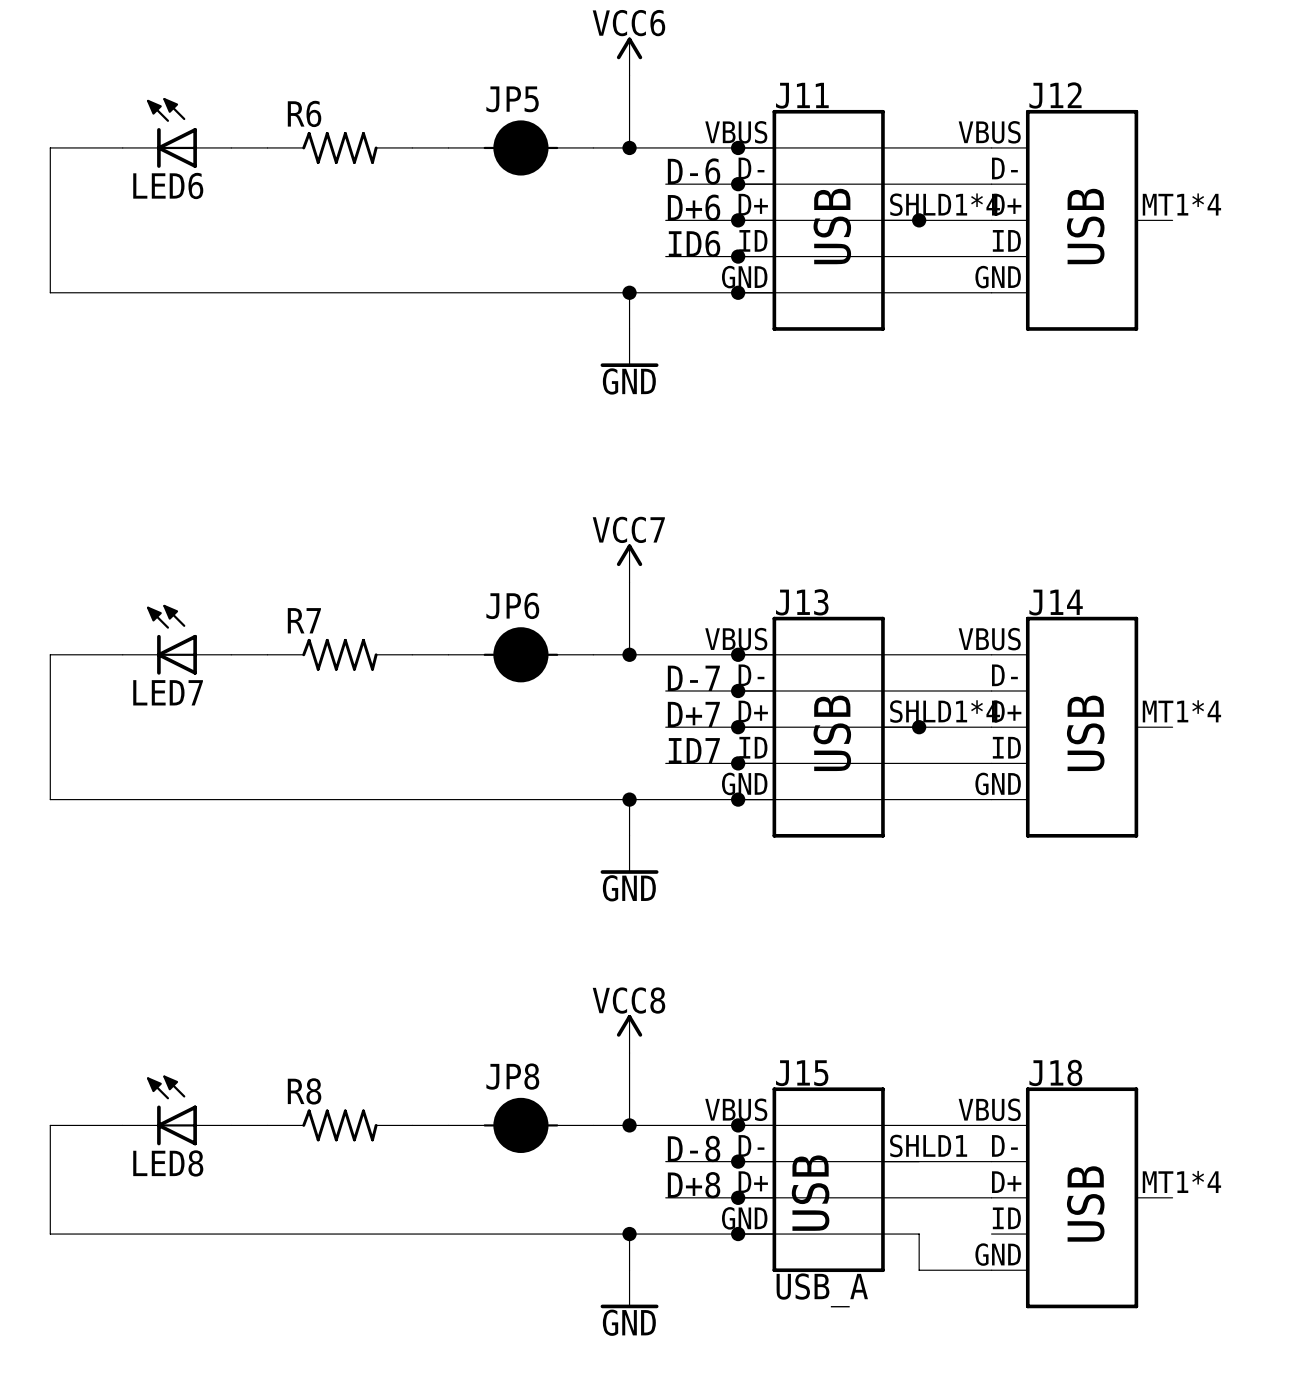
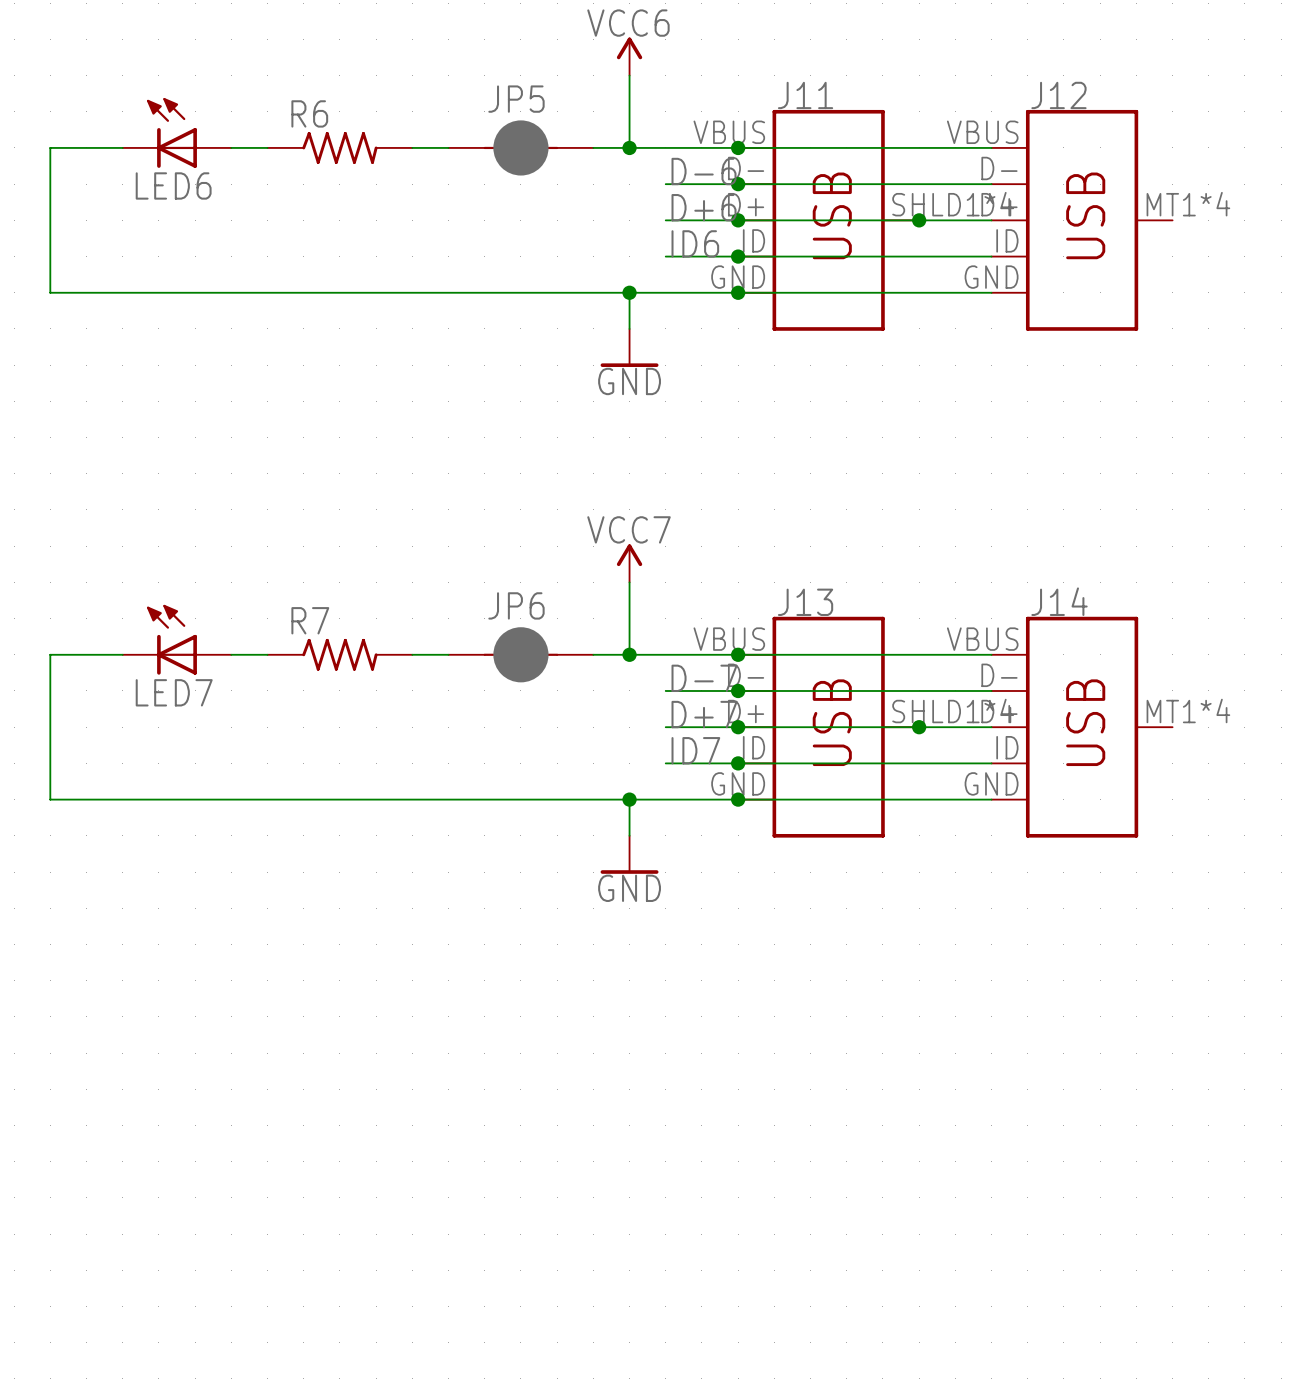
power symbol: VCC8 (629, 1034) -> none
wire: (629, 1053) (629, 1125) -> none
LED8: (177, 1110) -> none
wire: (122, 1125) (50, 1125) (50, 1234) (919, 1234) (919, 1270) (991, 1270) -> none
wire: (231, 1125) (267, 1125) -> none
R8: (339, 1125) -> none
wire: (412, 1125) (448, 1125) -> none
JP8: (520, 1125) -> none
wire: (593, 1125) (991, 1125) -> none
junction: (629, 1125) -> none
junction: (738, 1125) -> none
label: D-8 (694, 1148) -> none
wire: (665, 1161) (991, 1161) -> none
junction: (738, 1161) -> none
J15: USB_A (828, 1179) -> none
label: D+8 (694, 1185) -> none
wire: (665, 1197) (991, 1197) -> none
junction: (738, 1197) -> none
J18: (1082, 1197) -> none
wire: (629, 1234) (629, 1270) -> none
junction: (629, 1234) -> none
junction: (738, 1234) -> none
power symbol: GND (629, 1289) -> none

